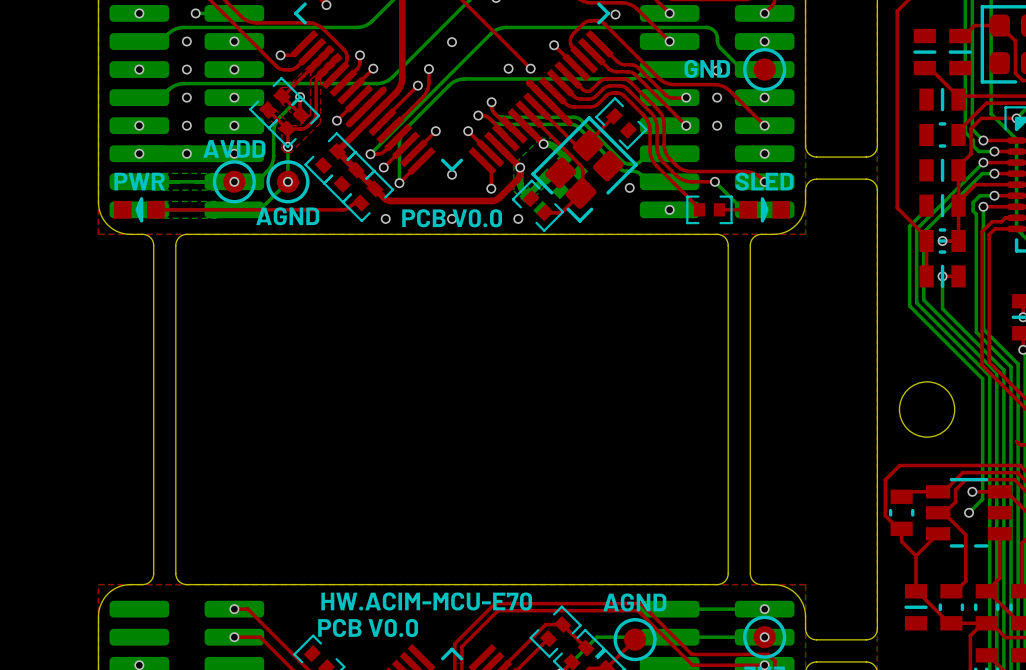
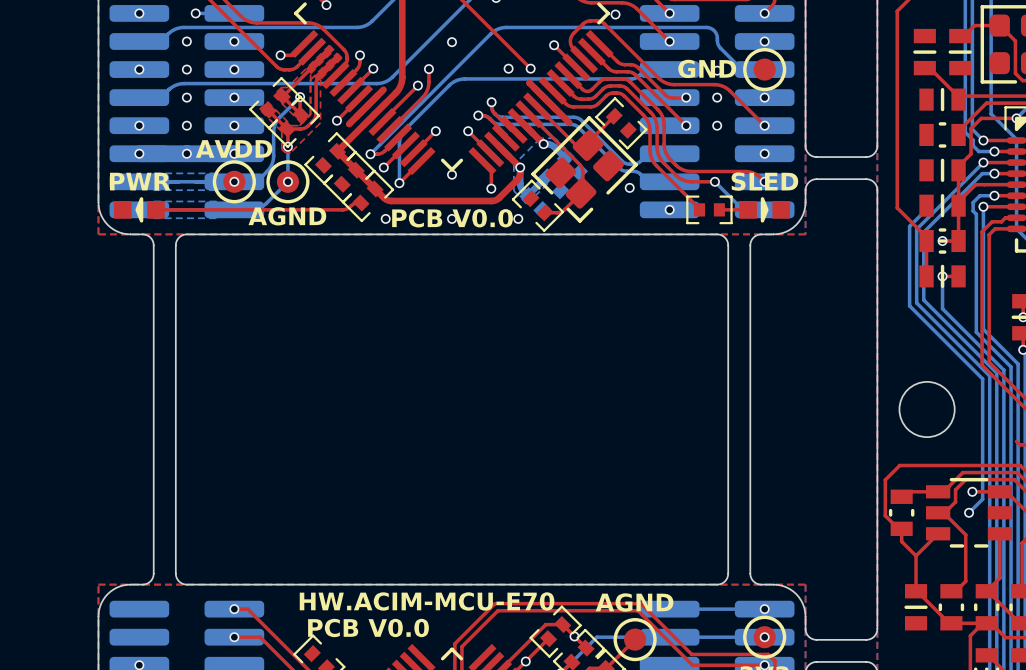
via: none -> (574, 636)
via: none -> (525, 661)

